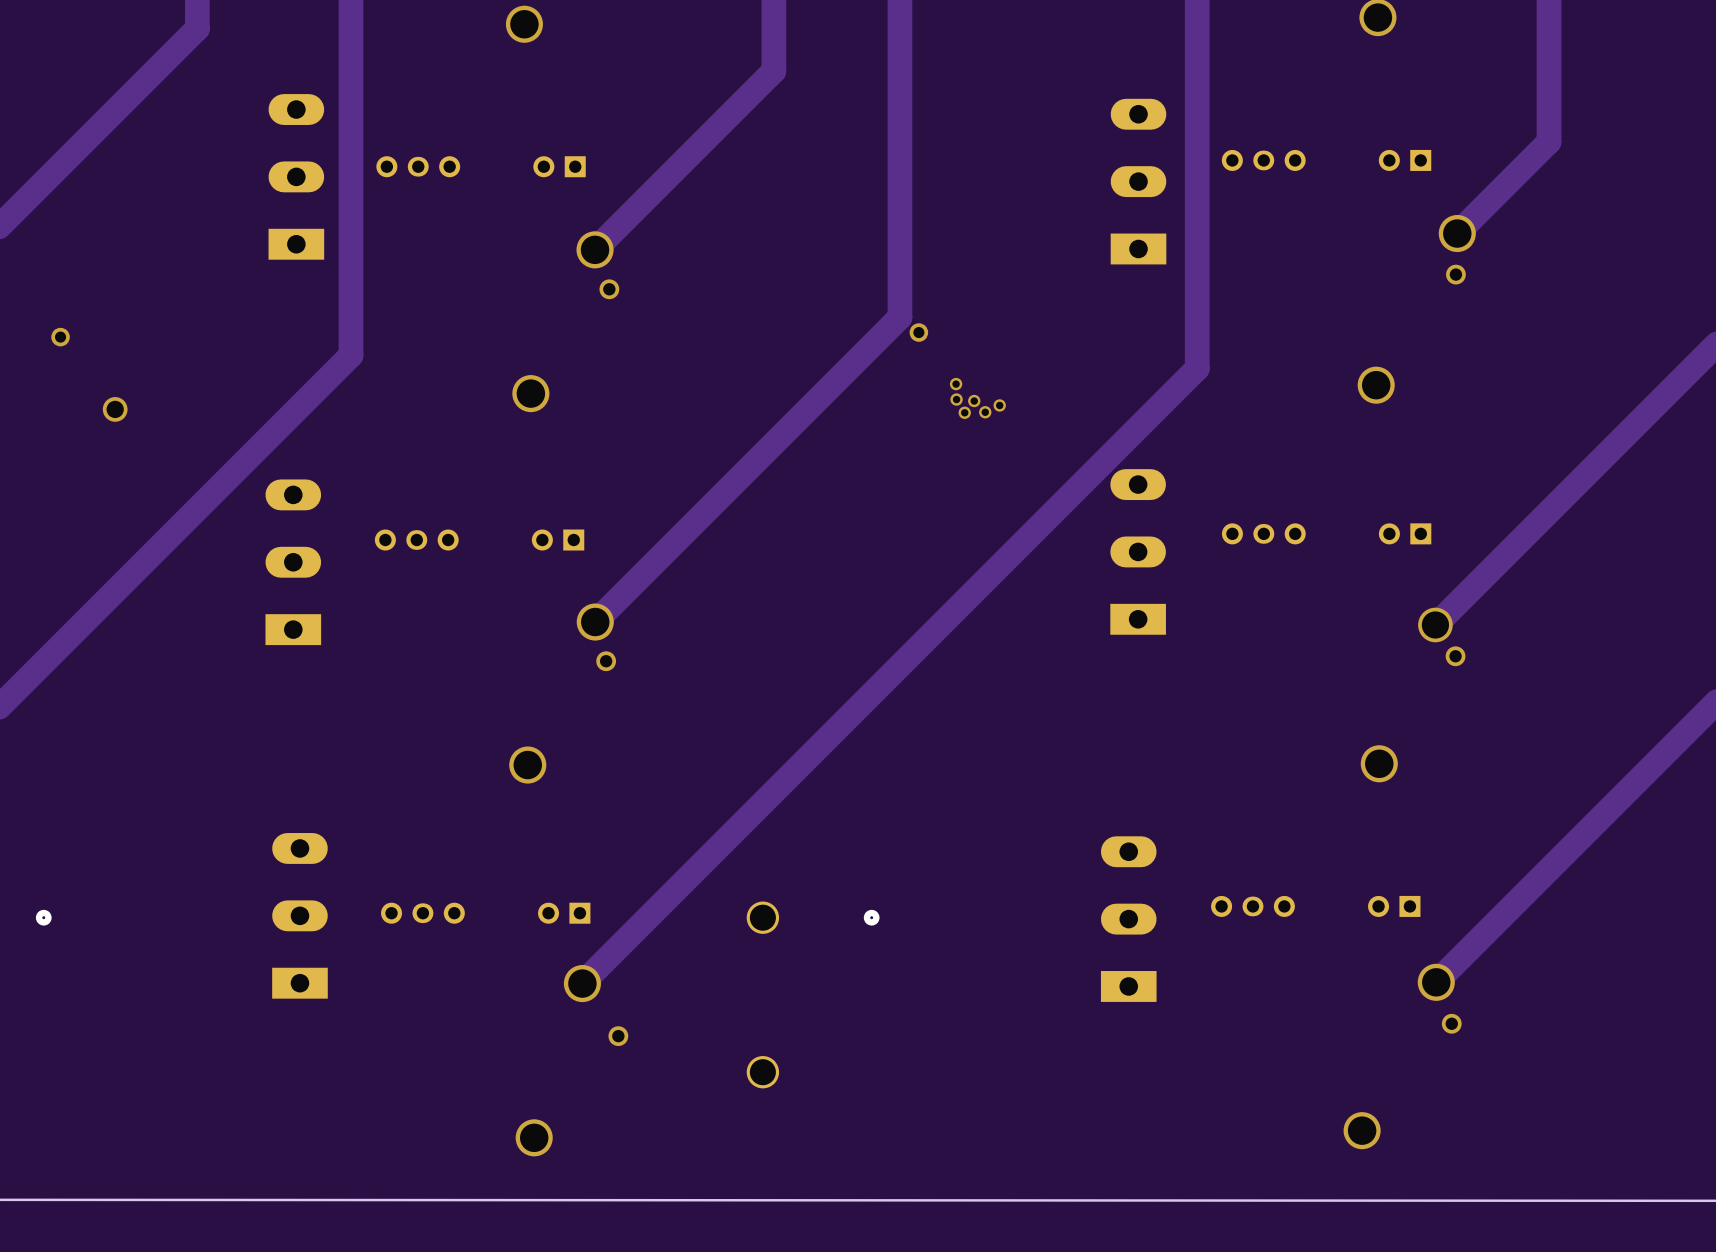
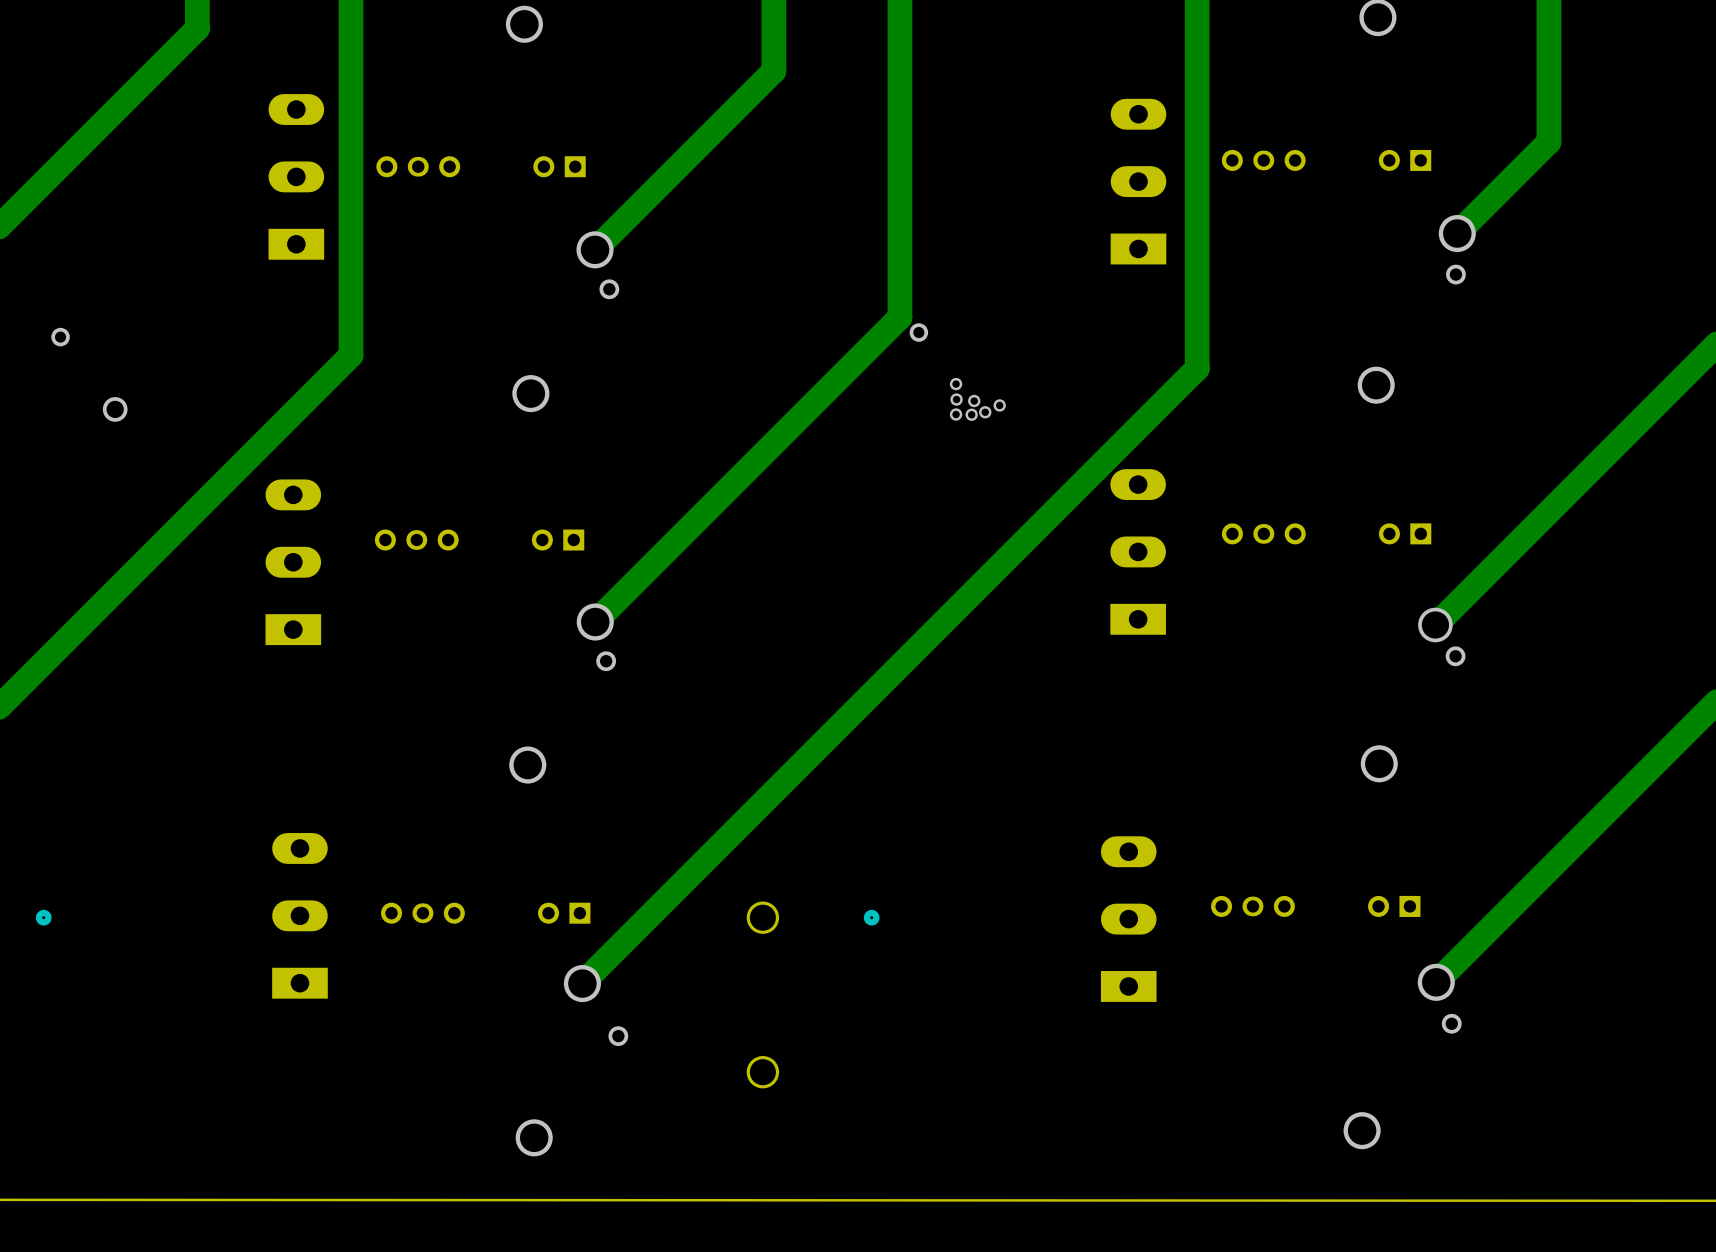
via: (964, 412) -> none
via: none -> (956, 414)
via: none -> (971, 414)

